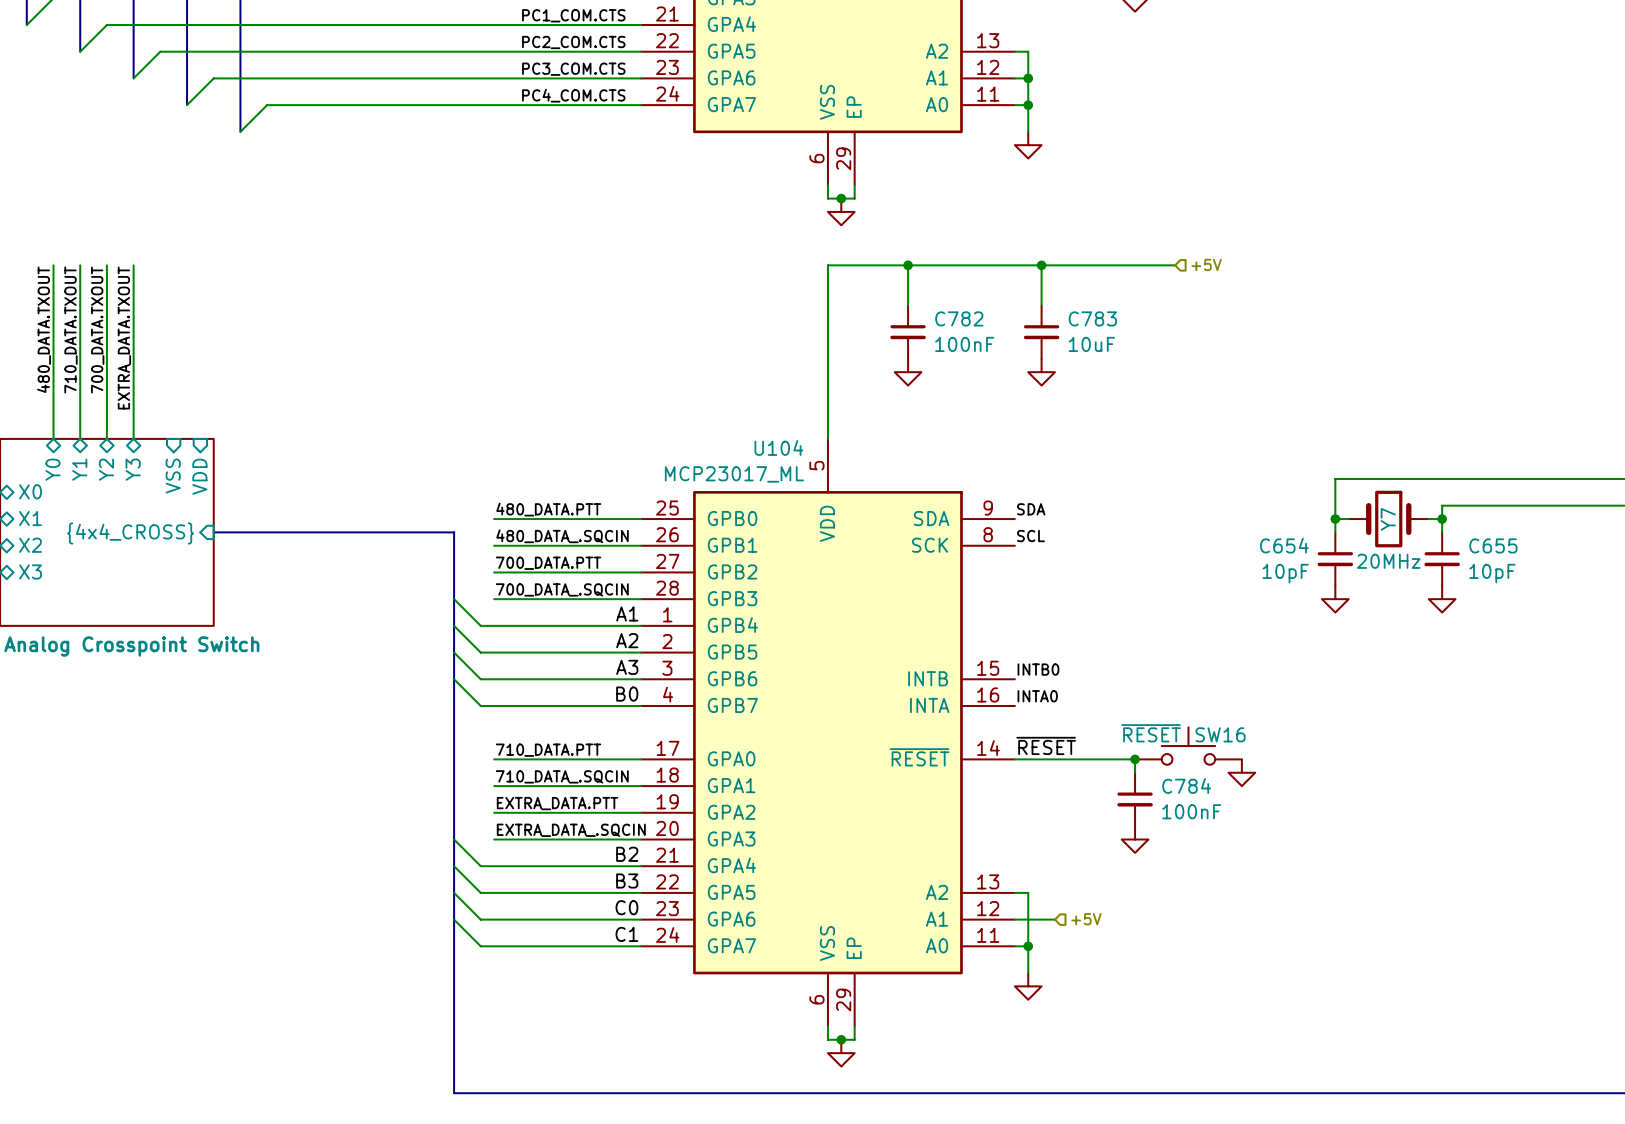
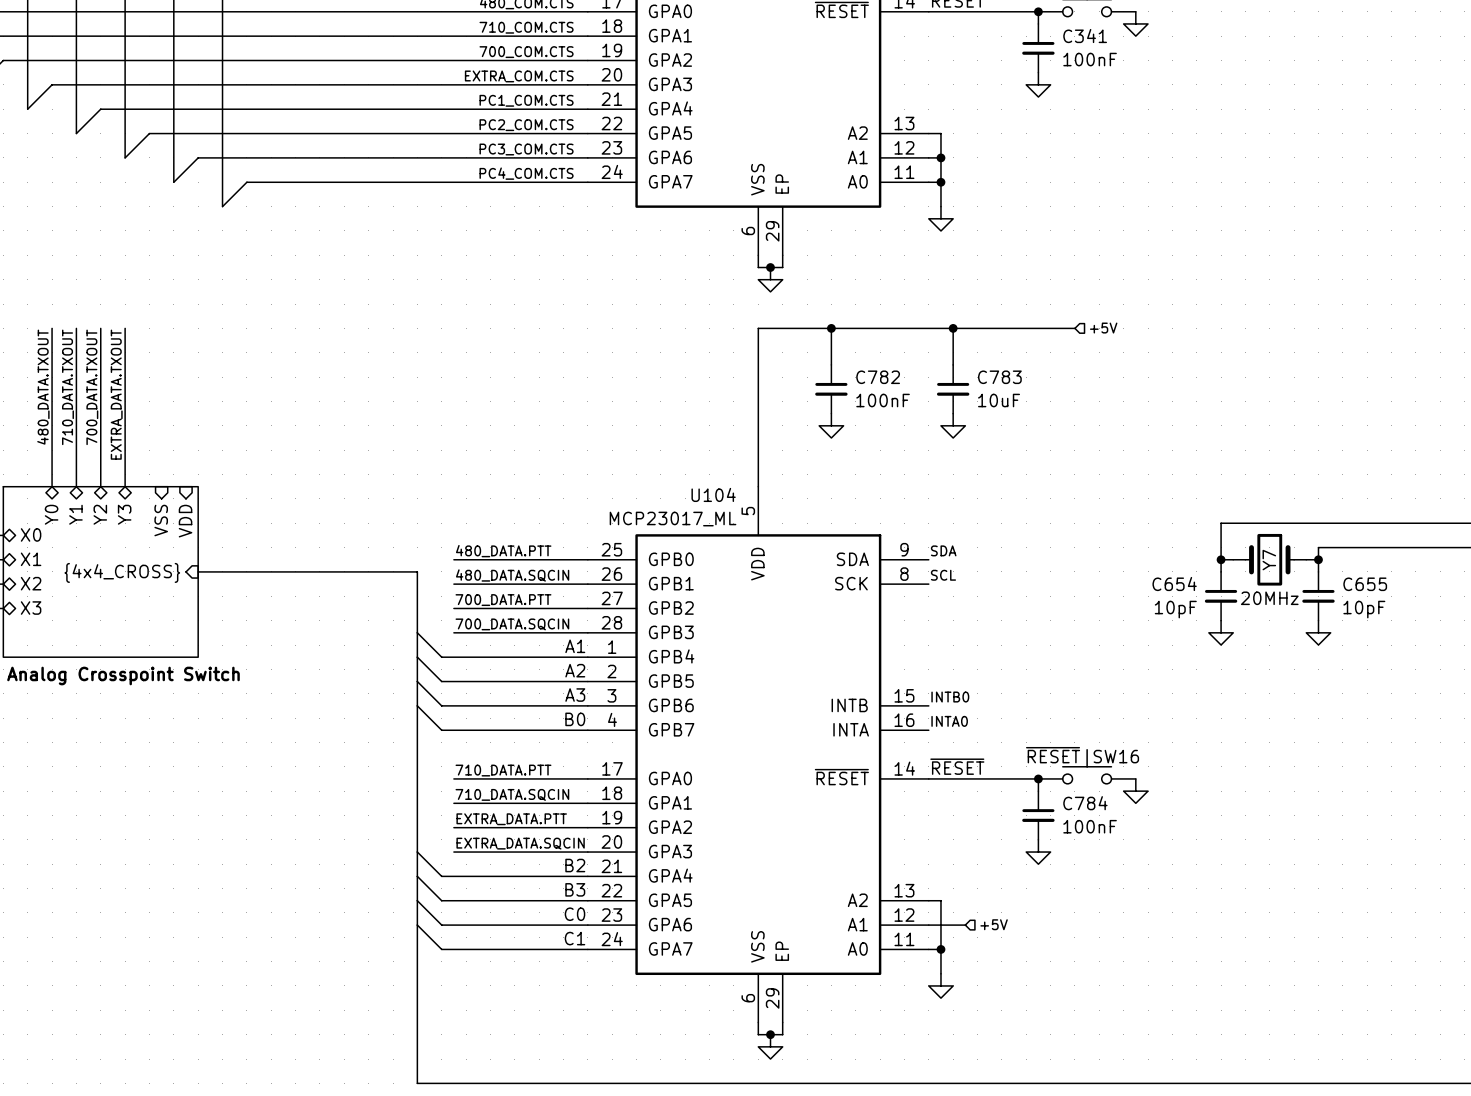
label: 480_DATA_.SQCIN (562, 536) -> 480_DATA.SQCIN (512, 575)
label: 700_DATA_.SQCIN (562, 589) -> 700_DATA.SQCIN (512, 624)
label: 710_DATA_.SQCIN (562, 776) -> 710_DATA.SQCIN (512, 794)
label: EXTRA_DATA_.SQCIN (571, 830) -> EXTRA_DATA.SQCIN (520, 843)

